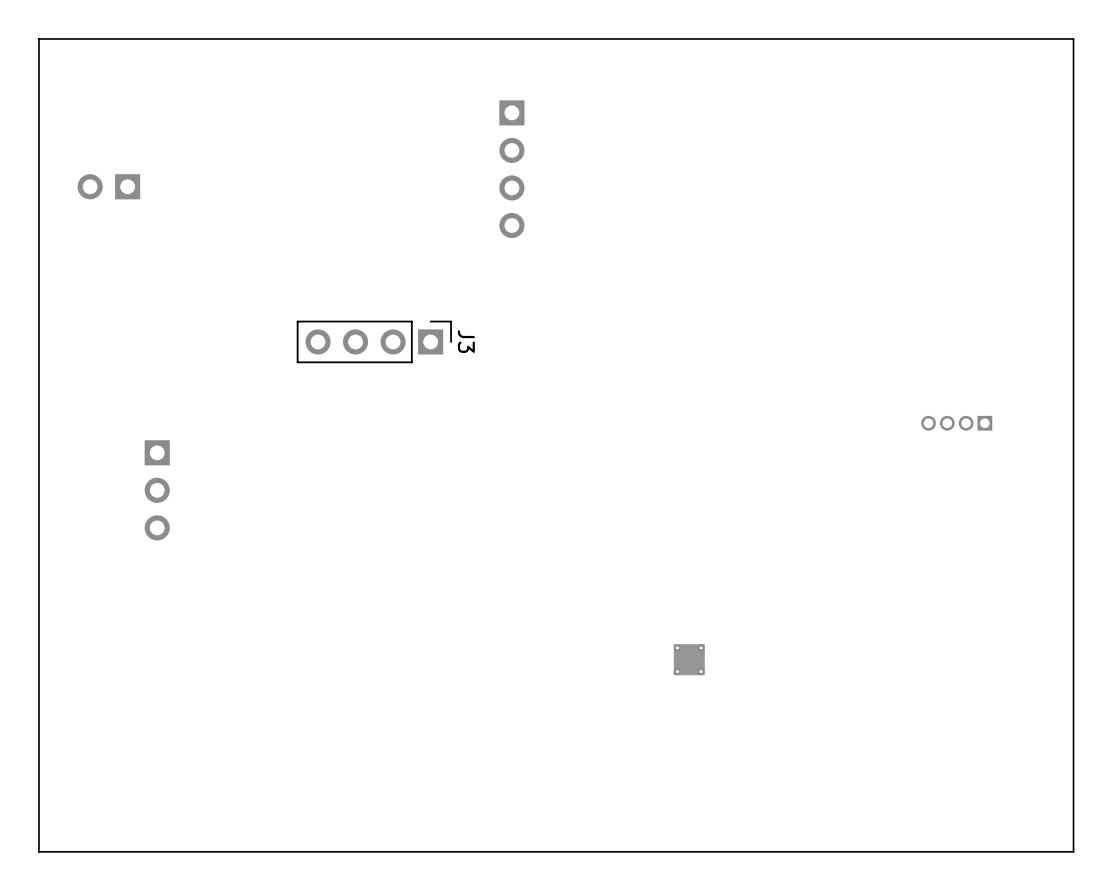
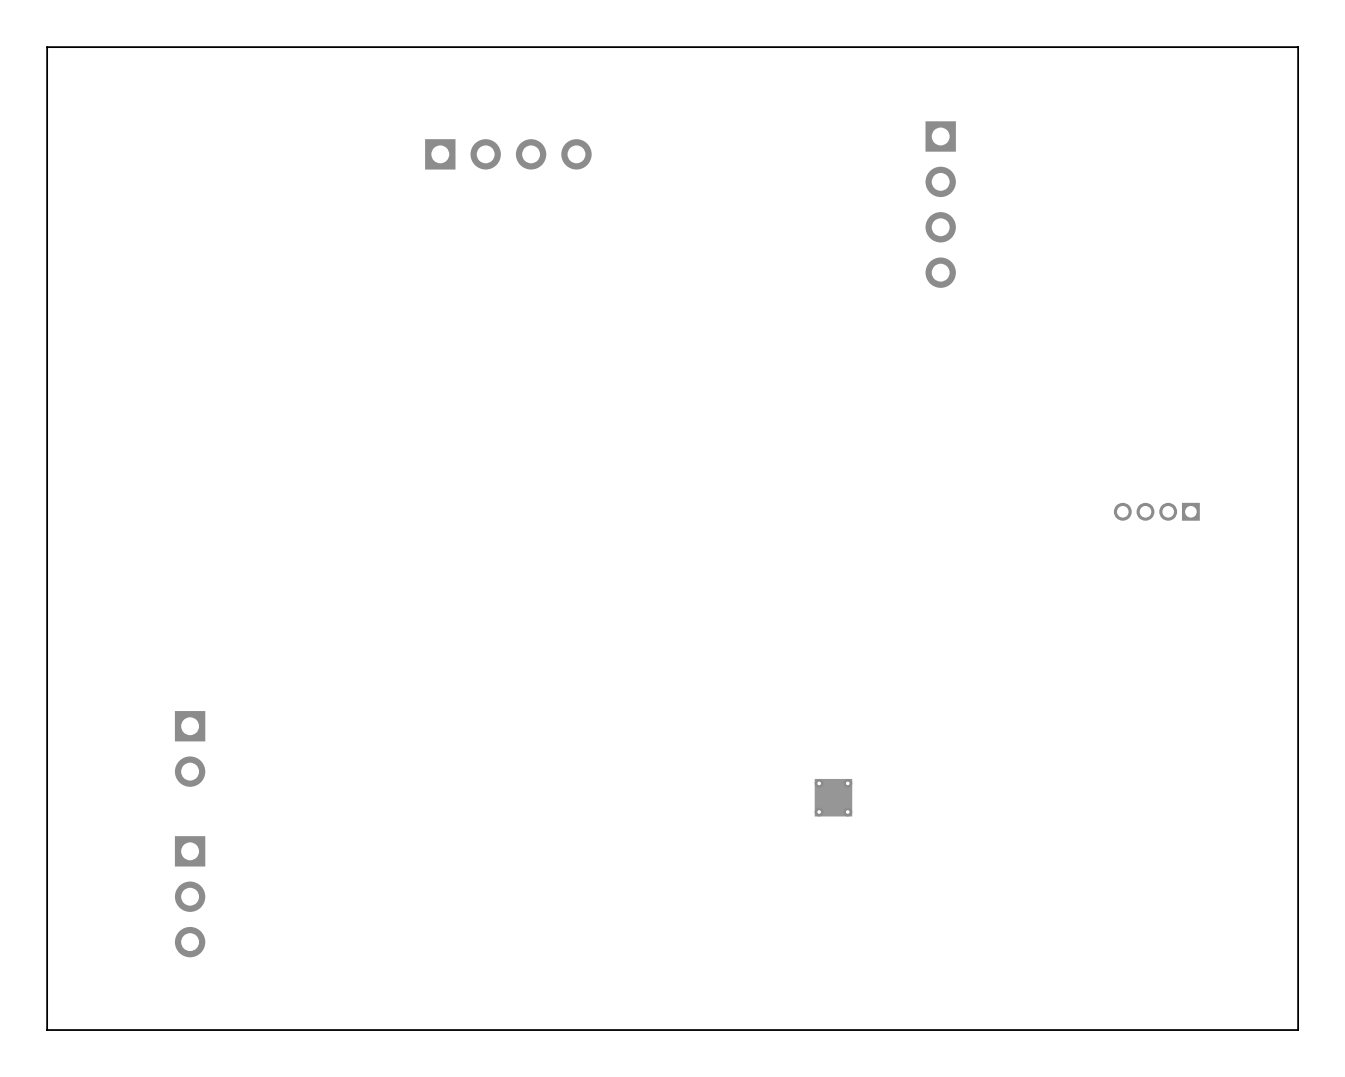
part rotation: 0° (511, 169) -> 90° counterclockwise (508, 154)
part position: (511, 169) -> (508, 154)
part: none -> (940, 204)
part: (108, 186) -> none
J3: (374, 341) -> none
part position: (157, 490) -> (190, 896)
part: none -> (190, 748)

